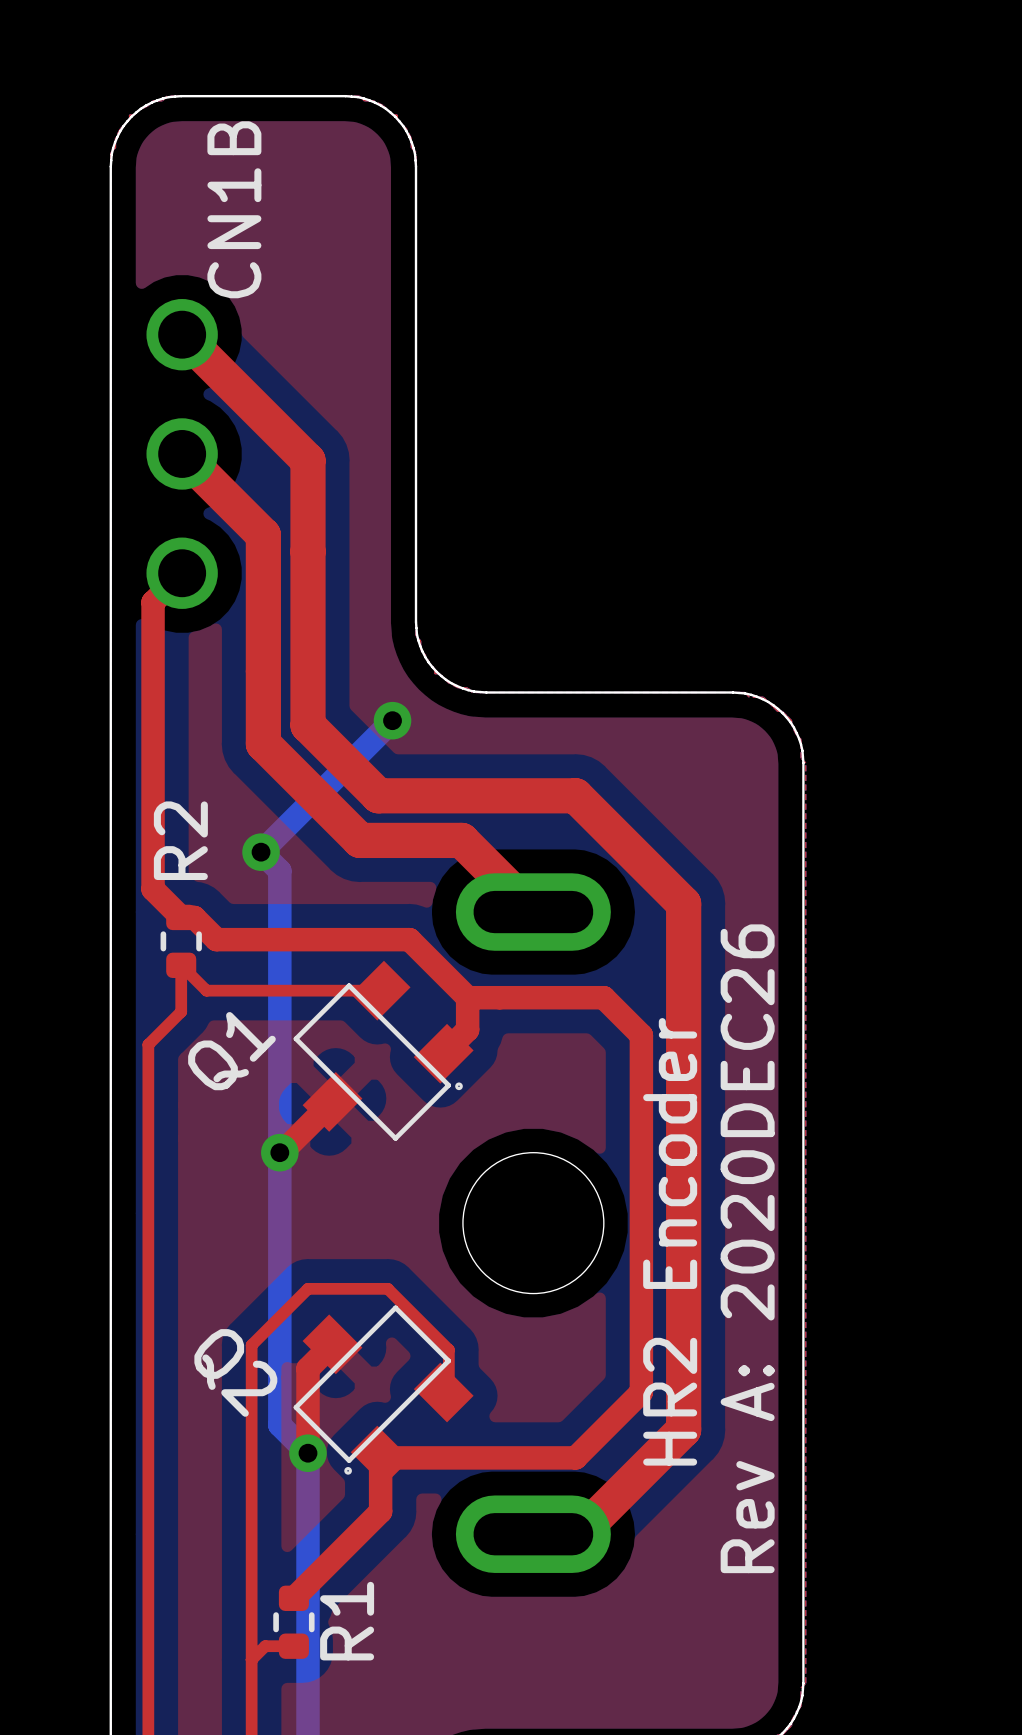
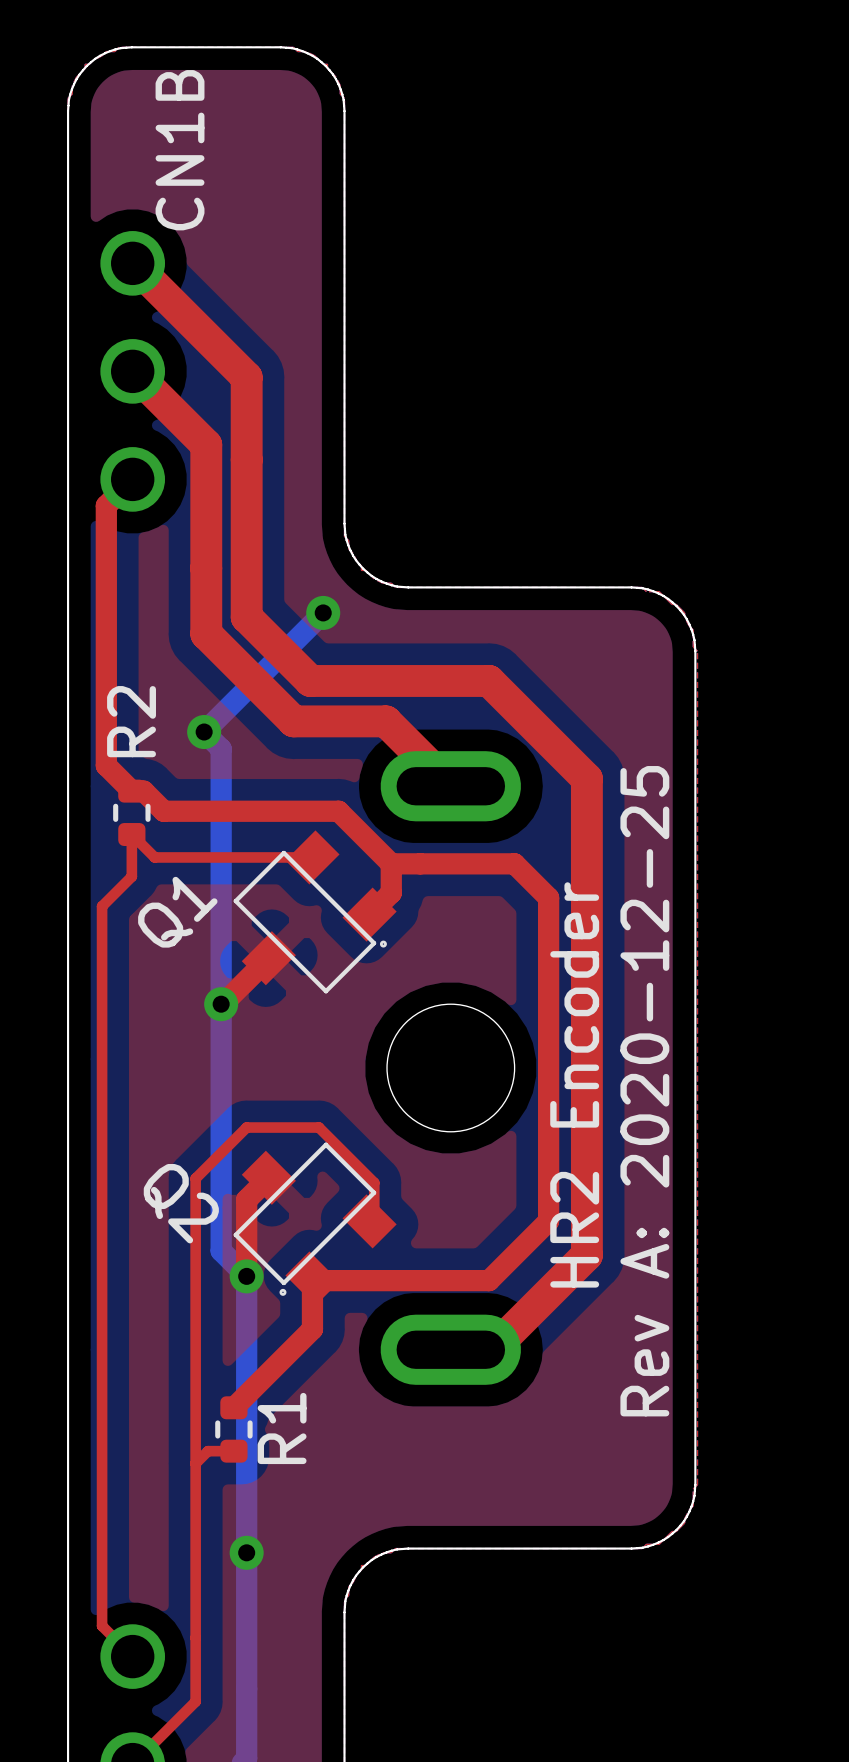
text: Rev A: 2020DEC26 (747, 1248) -> Rev A: 2020-12-25 (644, 1091)

